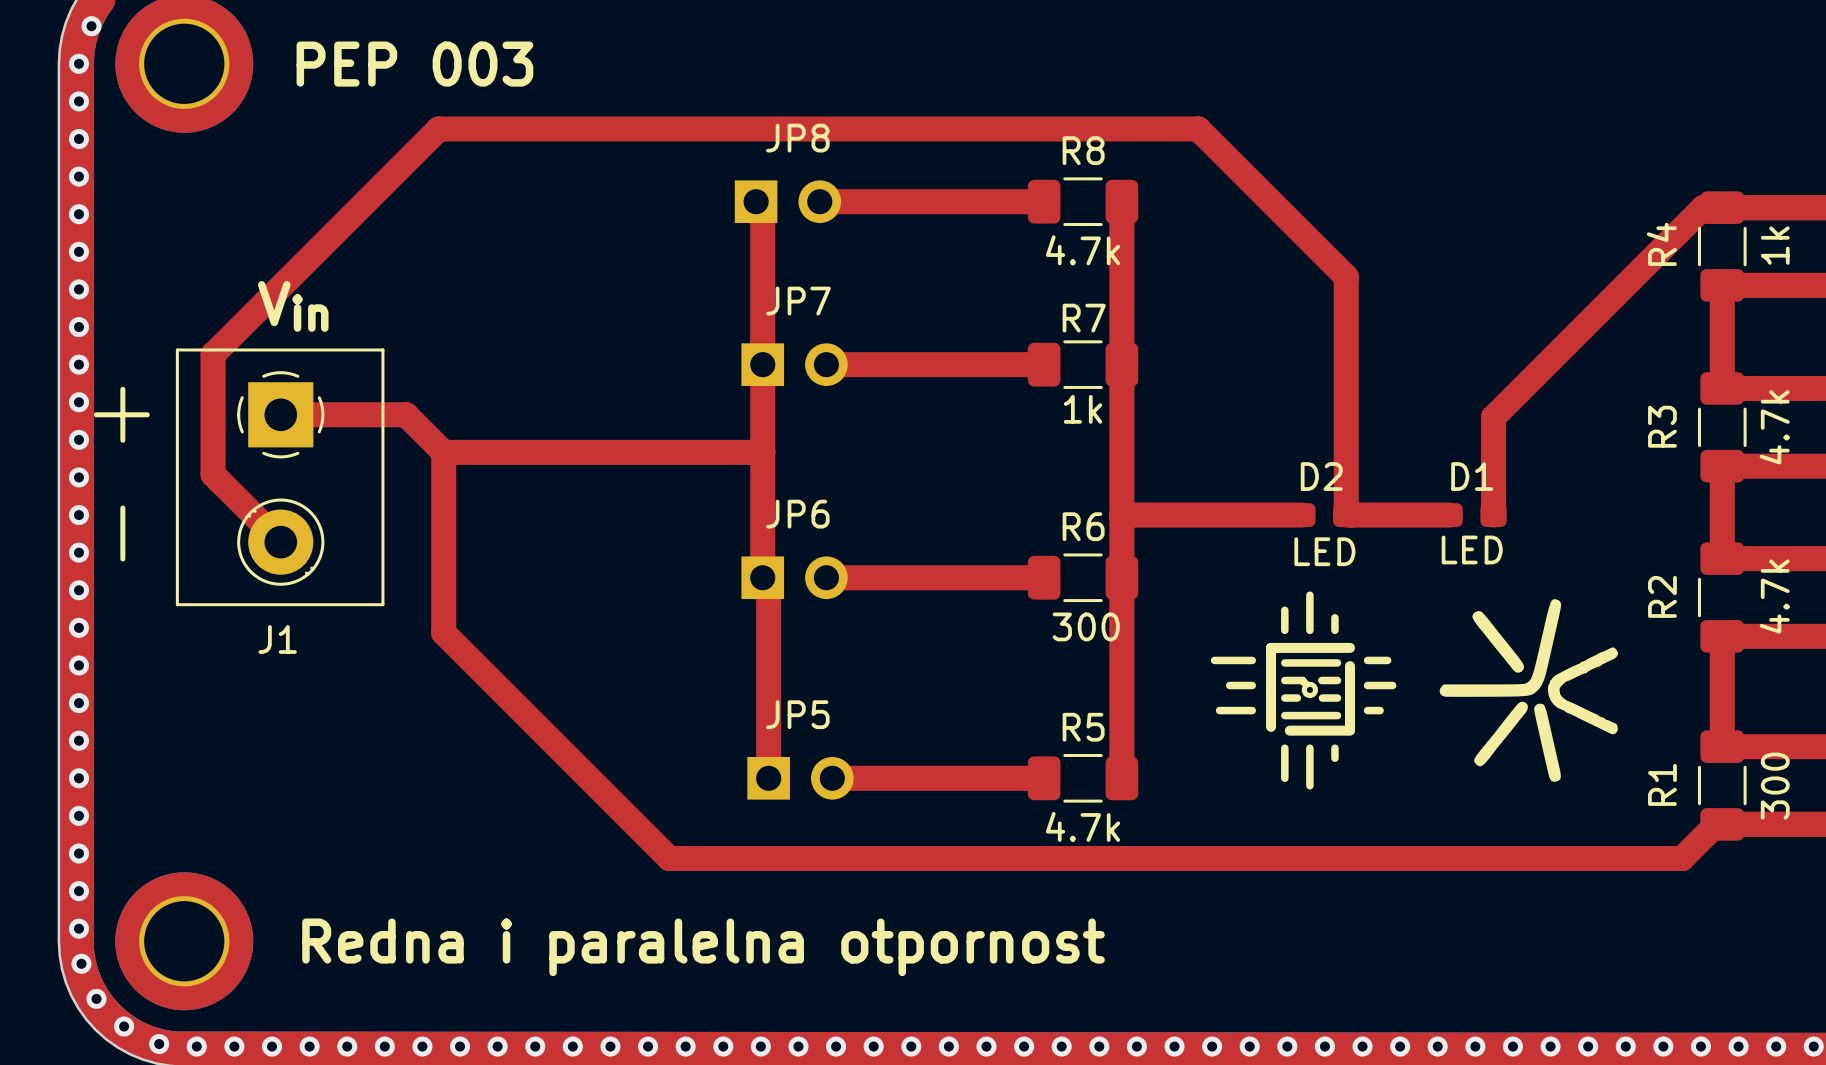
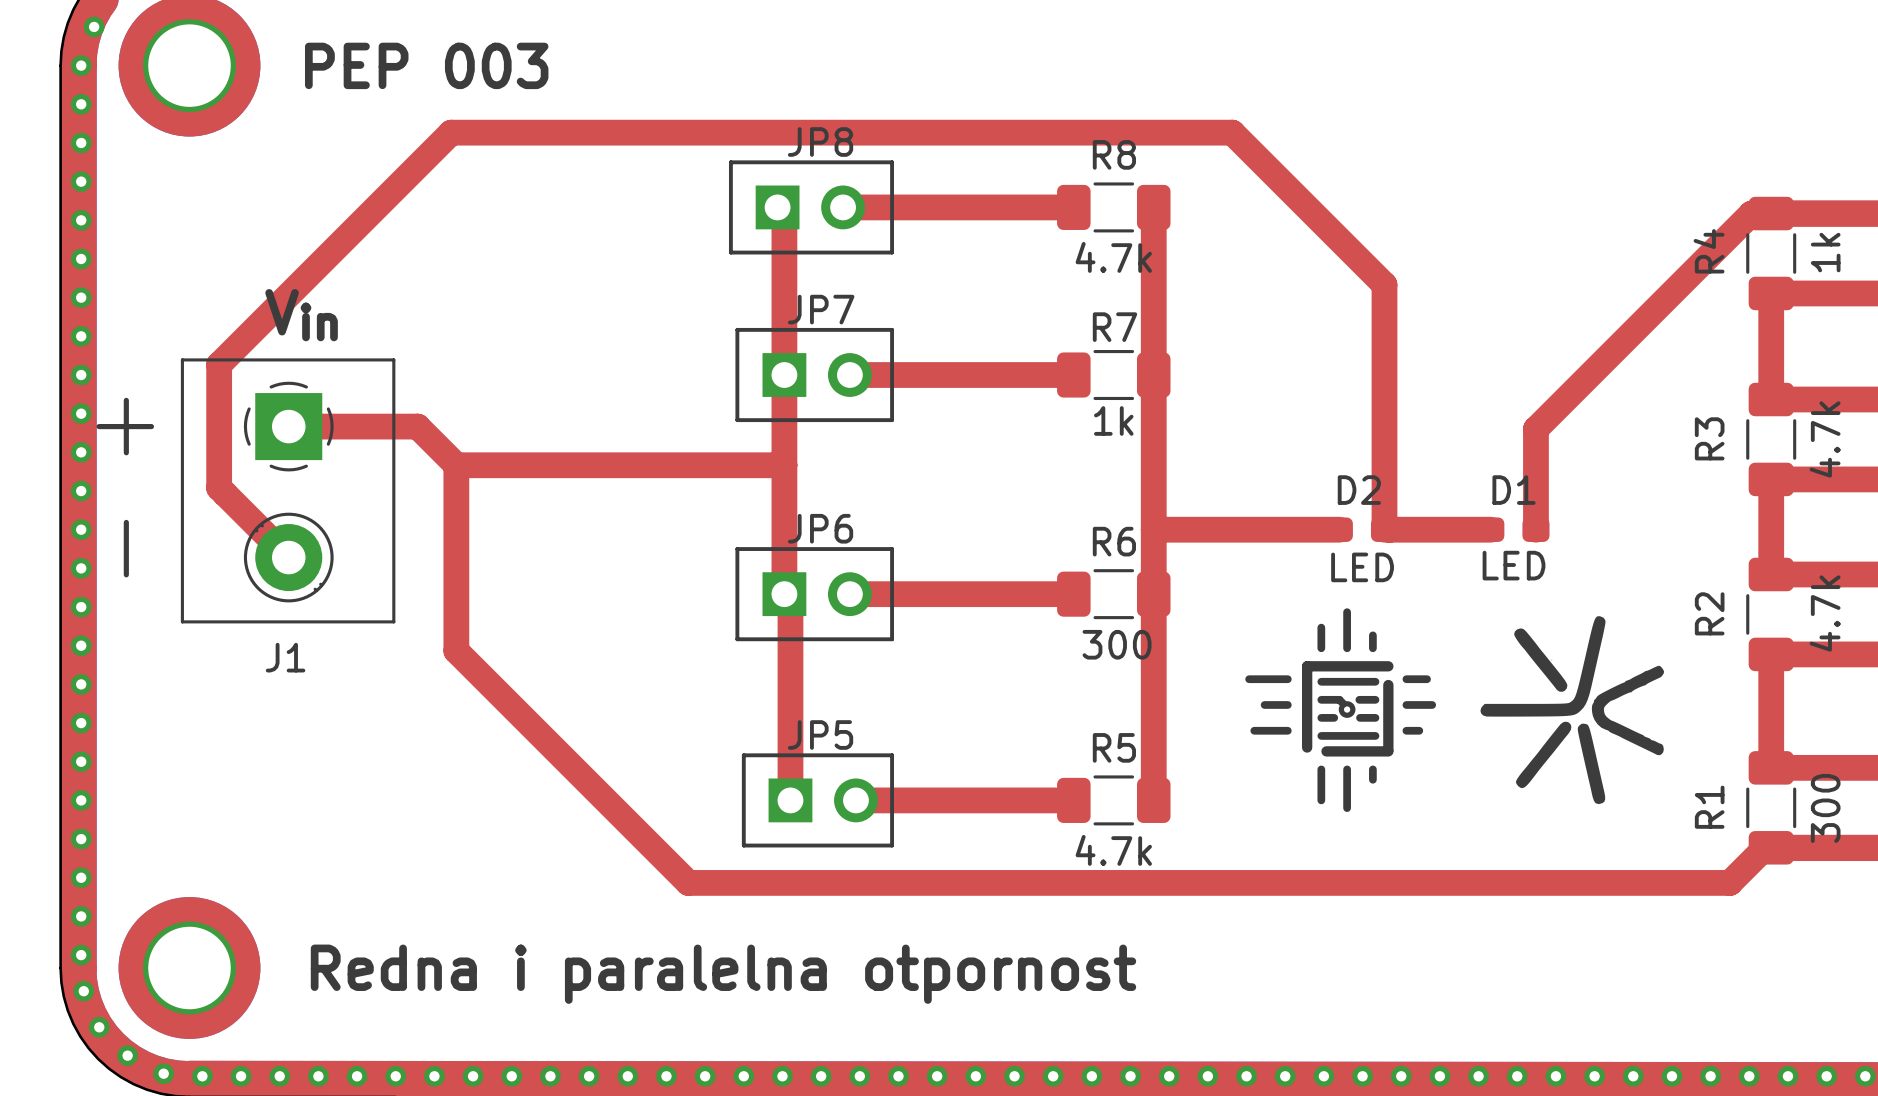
line: none -> (730, 162) (892, 162) (892, 252) (730, 252) (730, 162)
line: none -> (737, 329) (737, 420) (892, 420) (892, 329) (737, 329)
line: none -> (737, 549) (892, 549) (892, 639) (737, 639) (737, 549)
line: none -> (743, 755) (892, 755) (892, 845) (743, 845) (743, 755)

